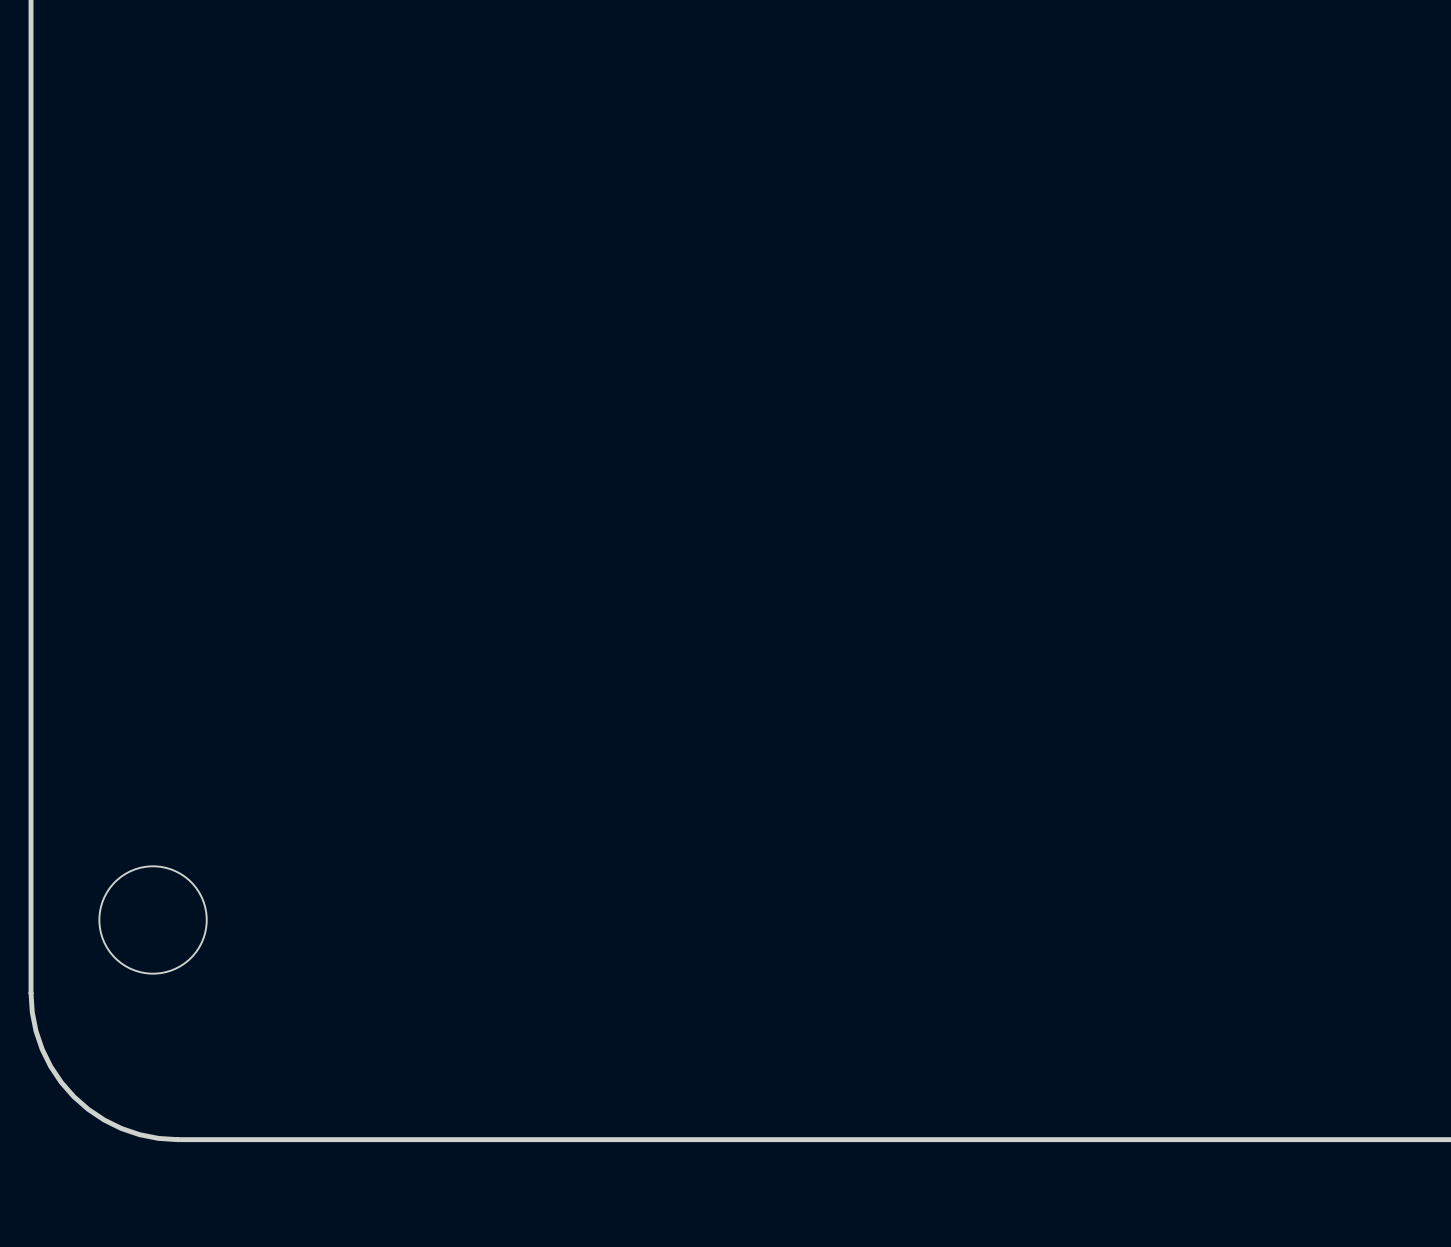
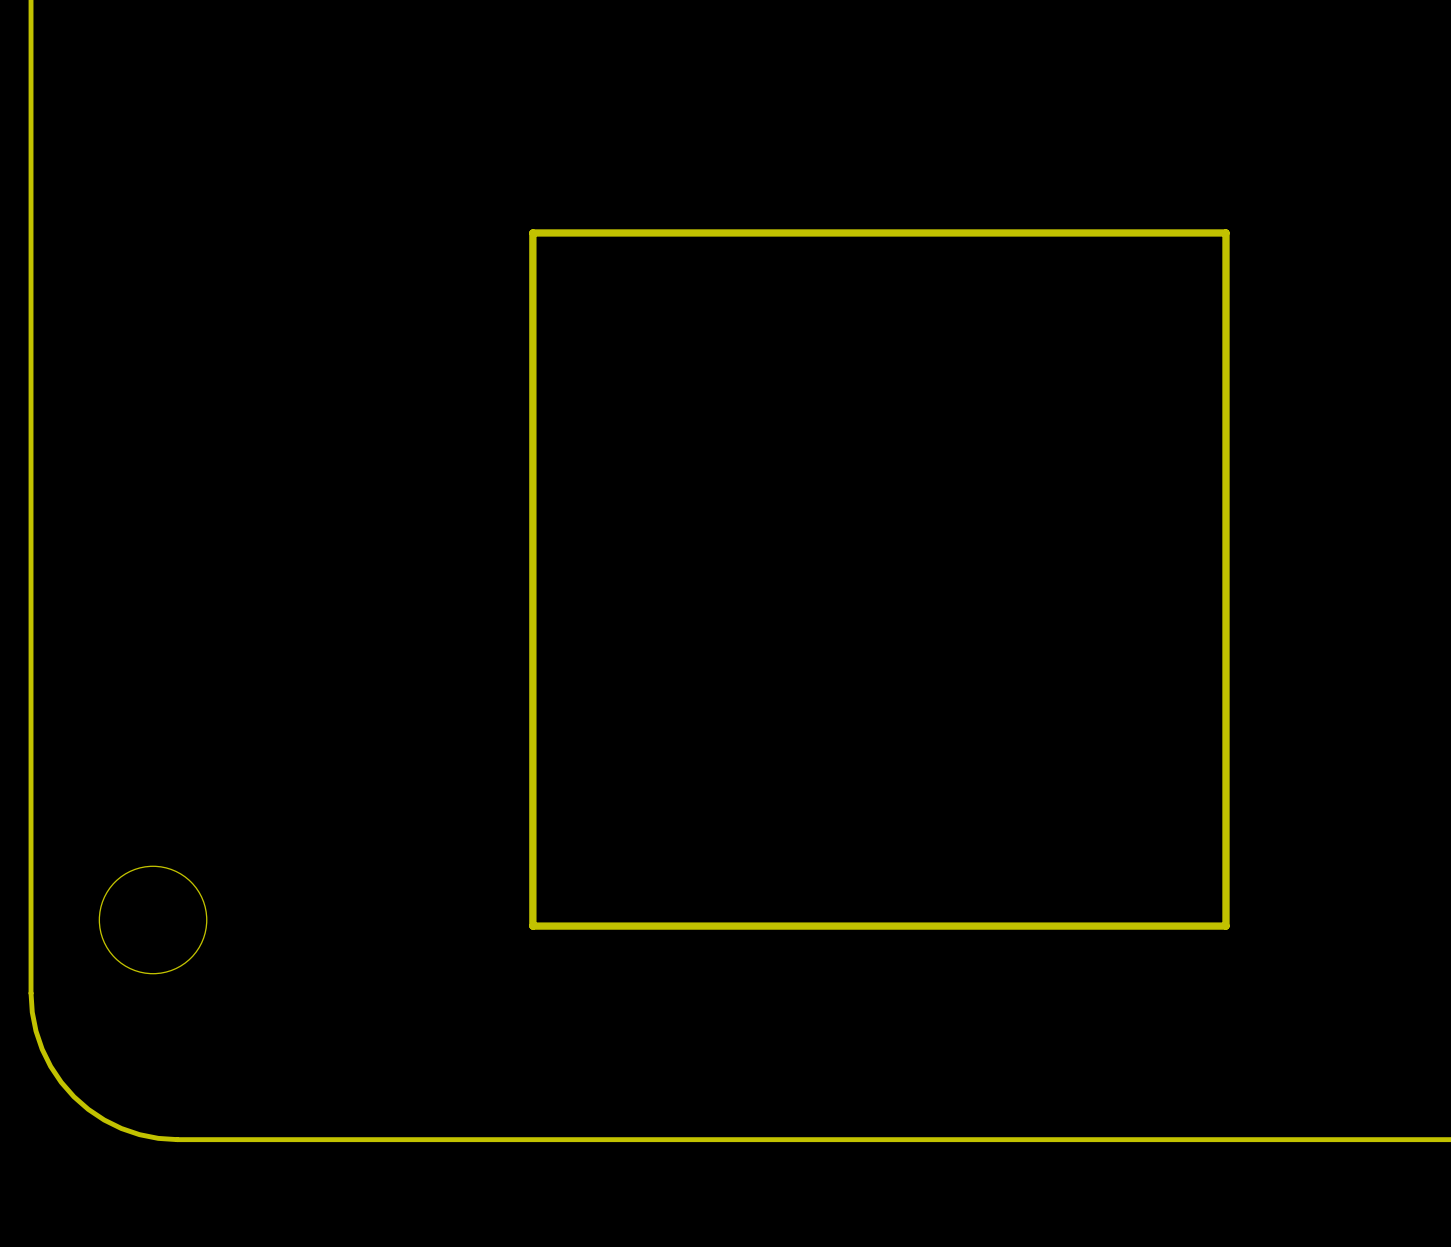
drawing: none -> [529, 229, 1230, 930]

